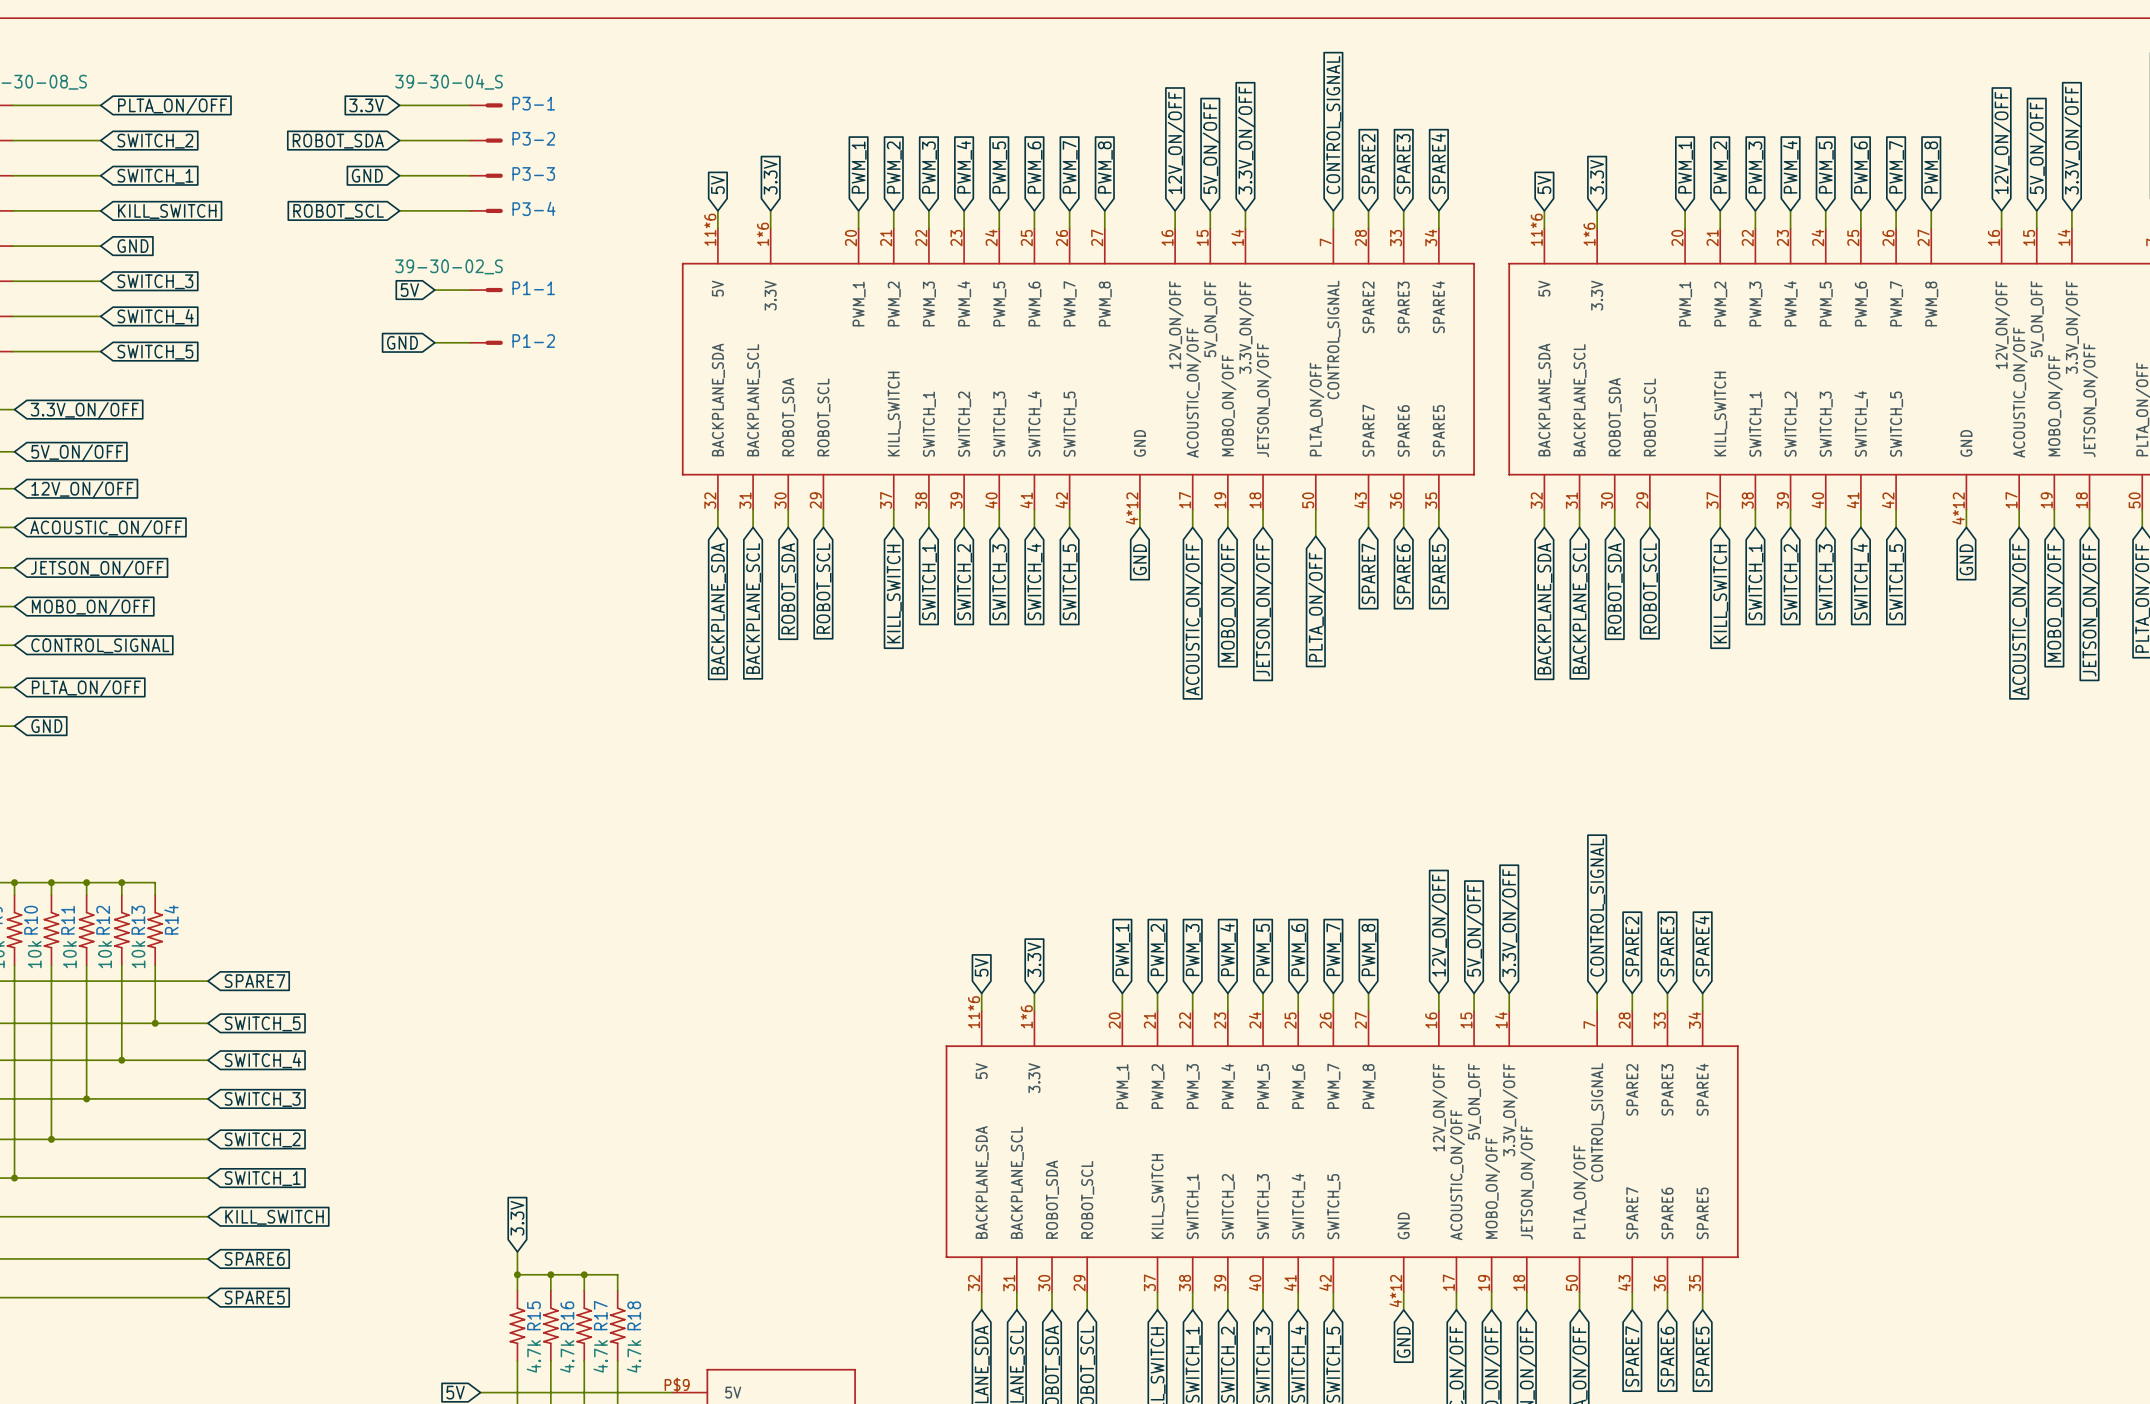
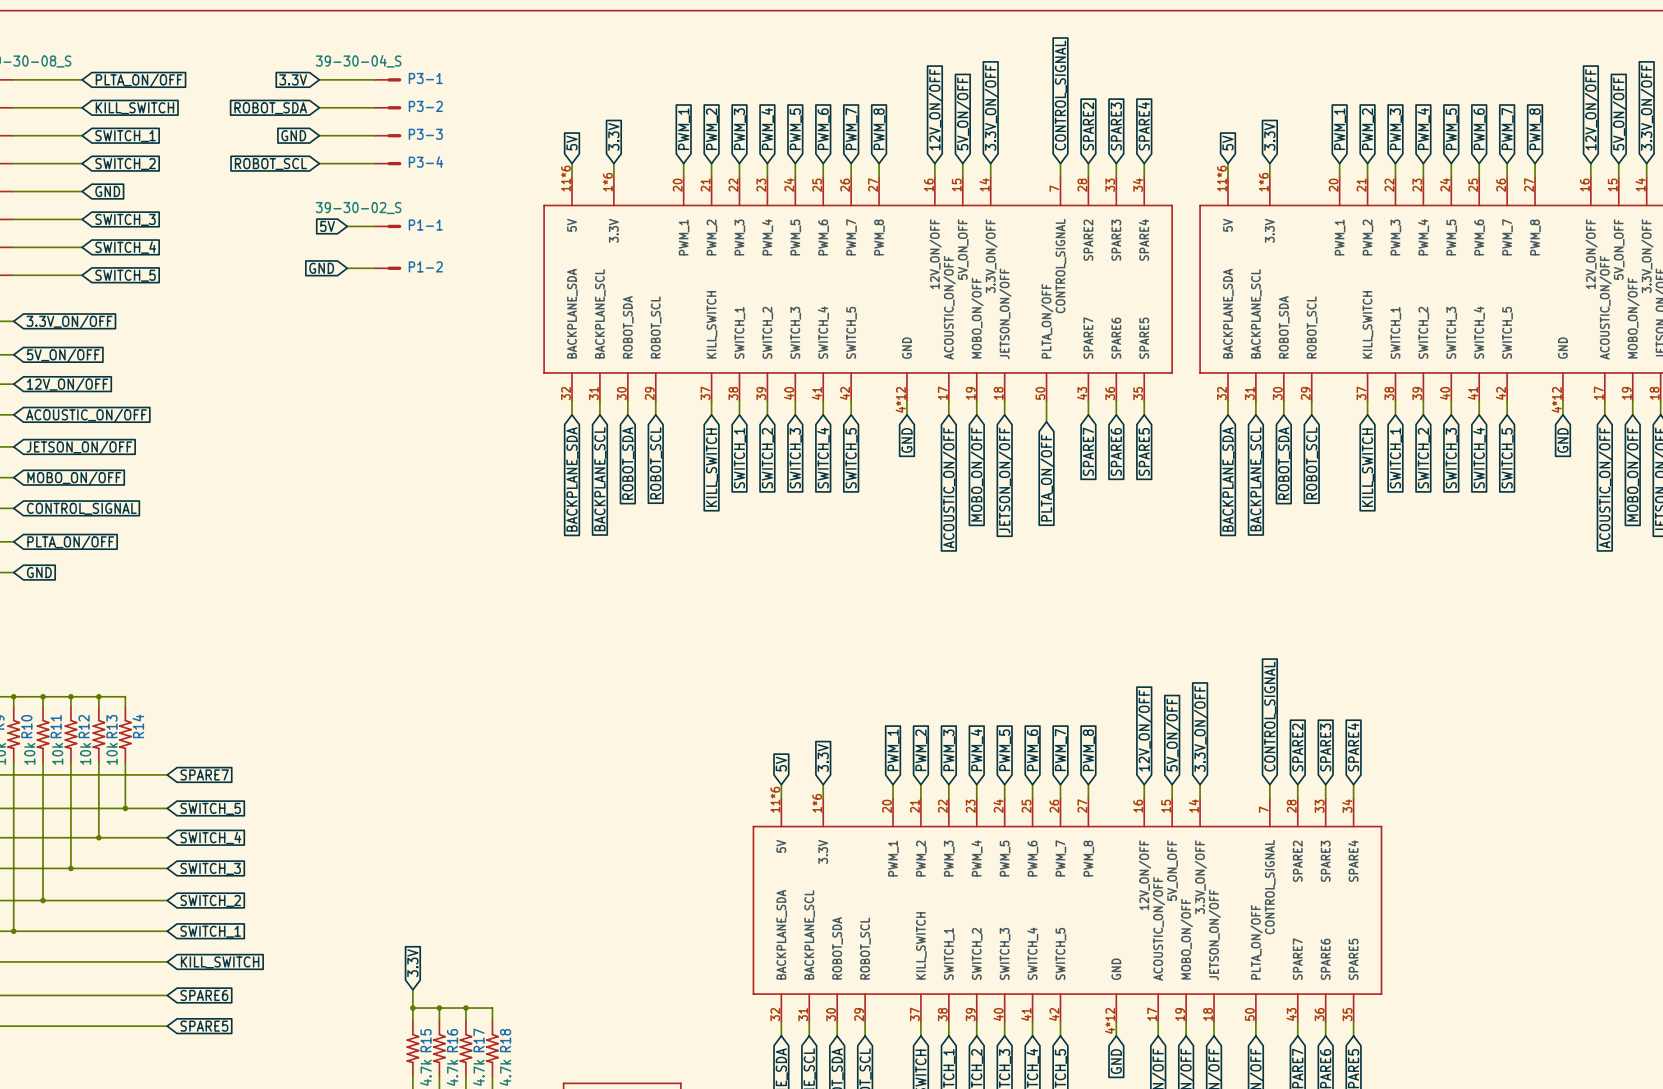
global label: SWITCH_2 (155, 141) -> KILL_SWITCH (134, 108)
global label: KILL_SWITCH (167, 211) -> SWITCH_2 (125, 164)

